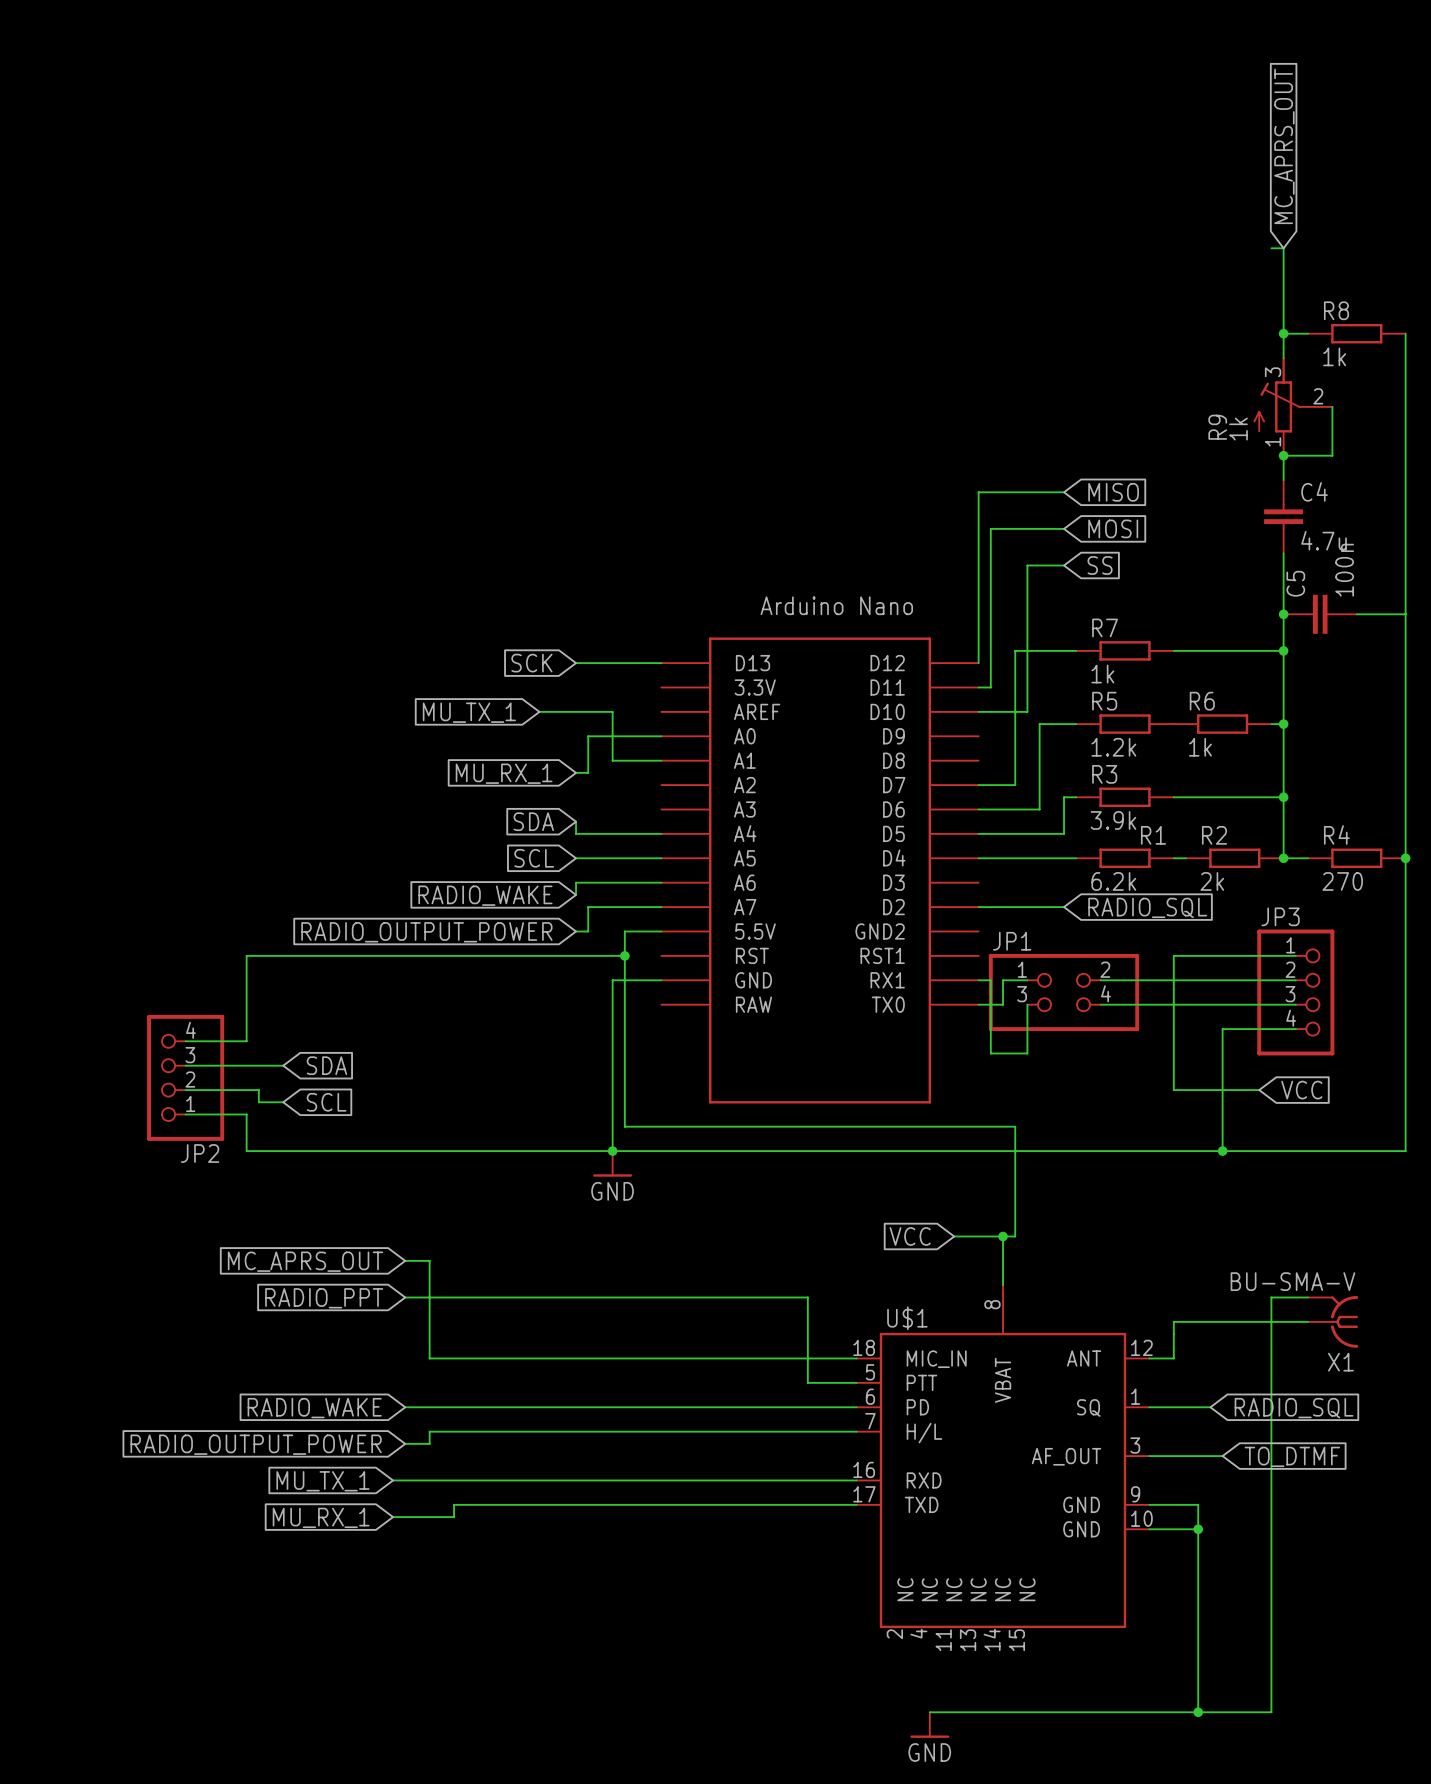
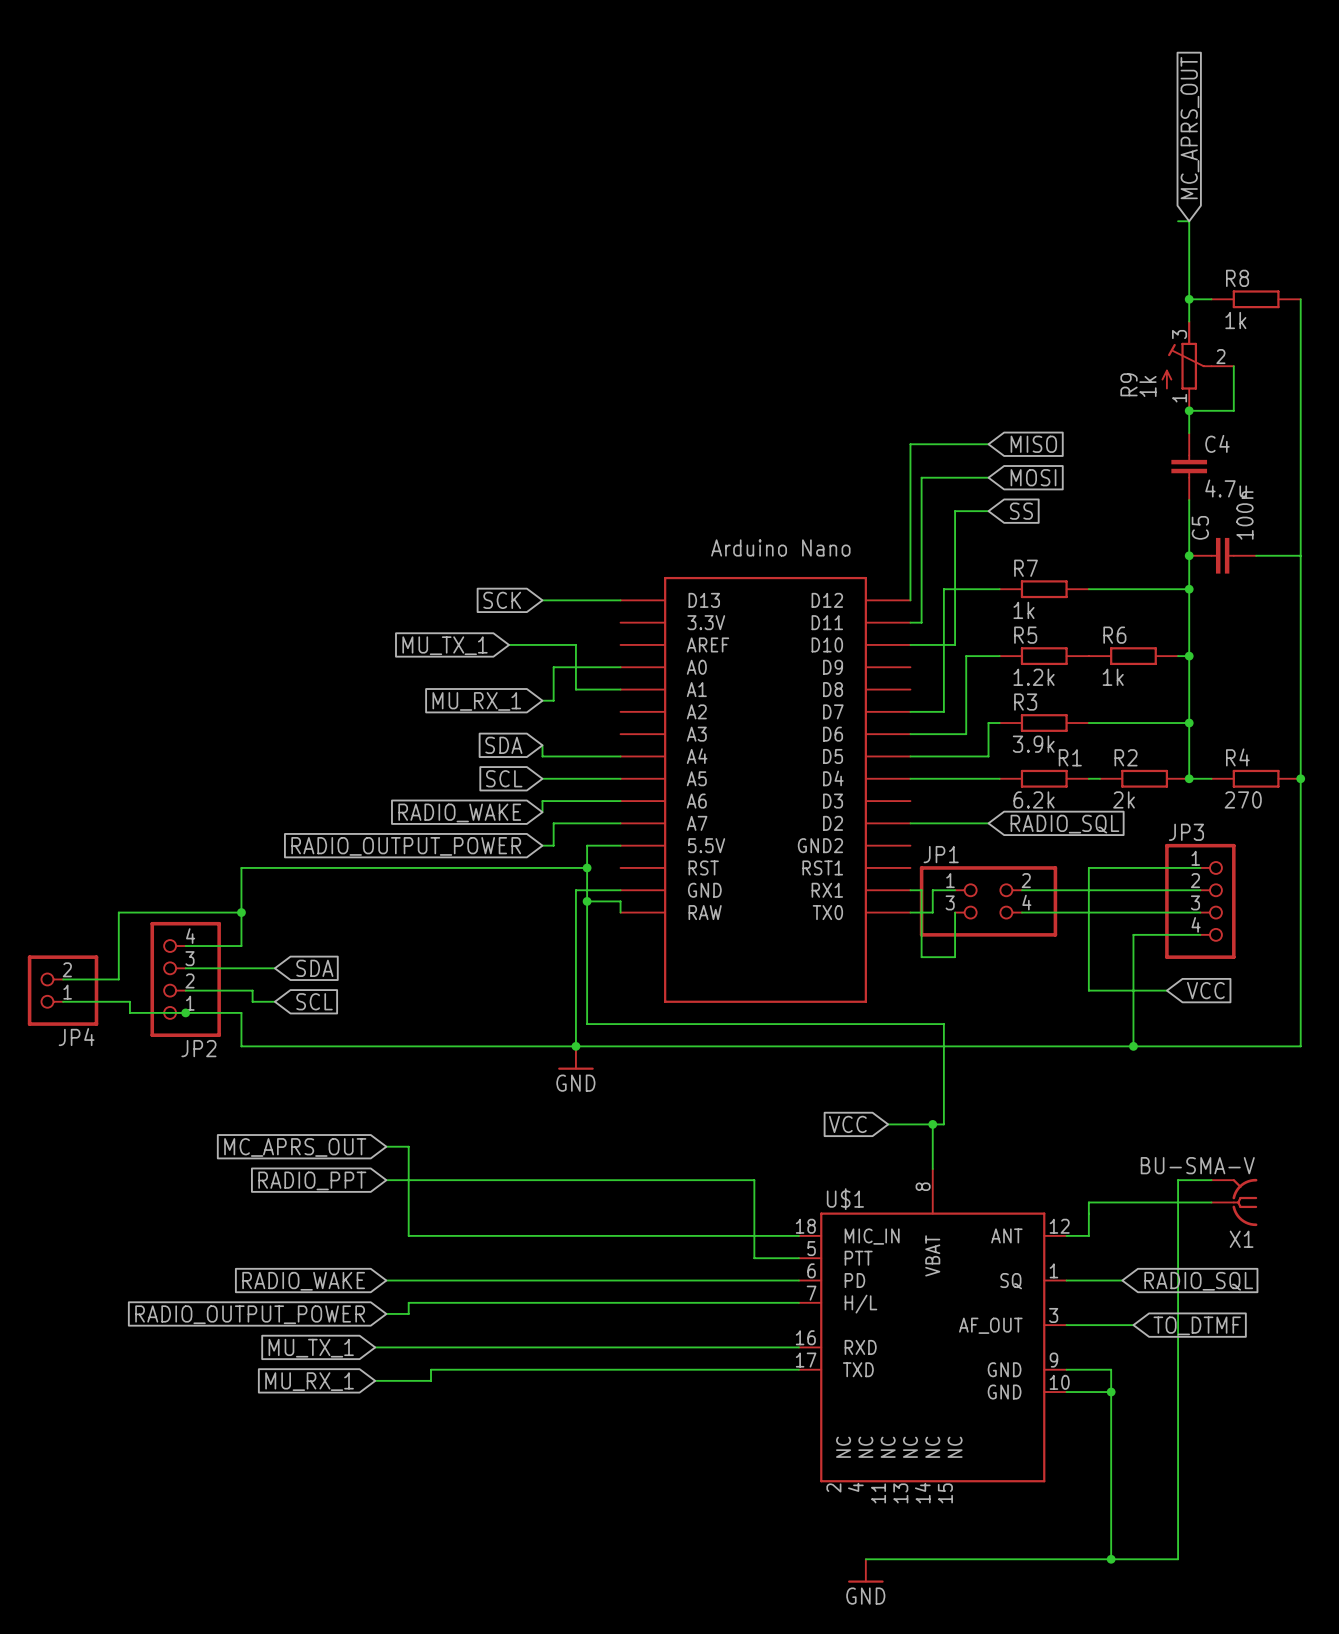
wire: none -> (587, 901) (620, 901) (620, 912)
junction: none -> (587, 901)
wire: none -> (241, 912) (118, 912) (118, 979) (63, 979)
junction: none -> (241, 912)
JP4: none -> (63, 990)
wire: none -> (63, 1001) (129, 1001) (129, 1012) (185, 1012)
junction: none -> (185, 1012)

